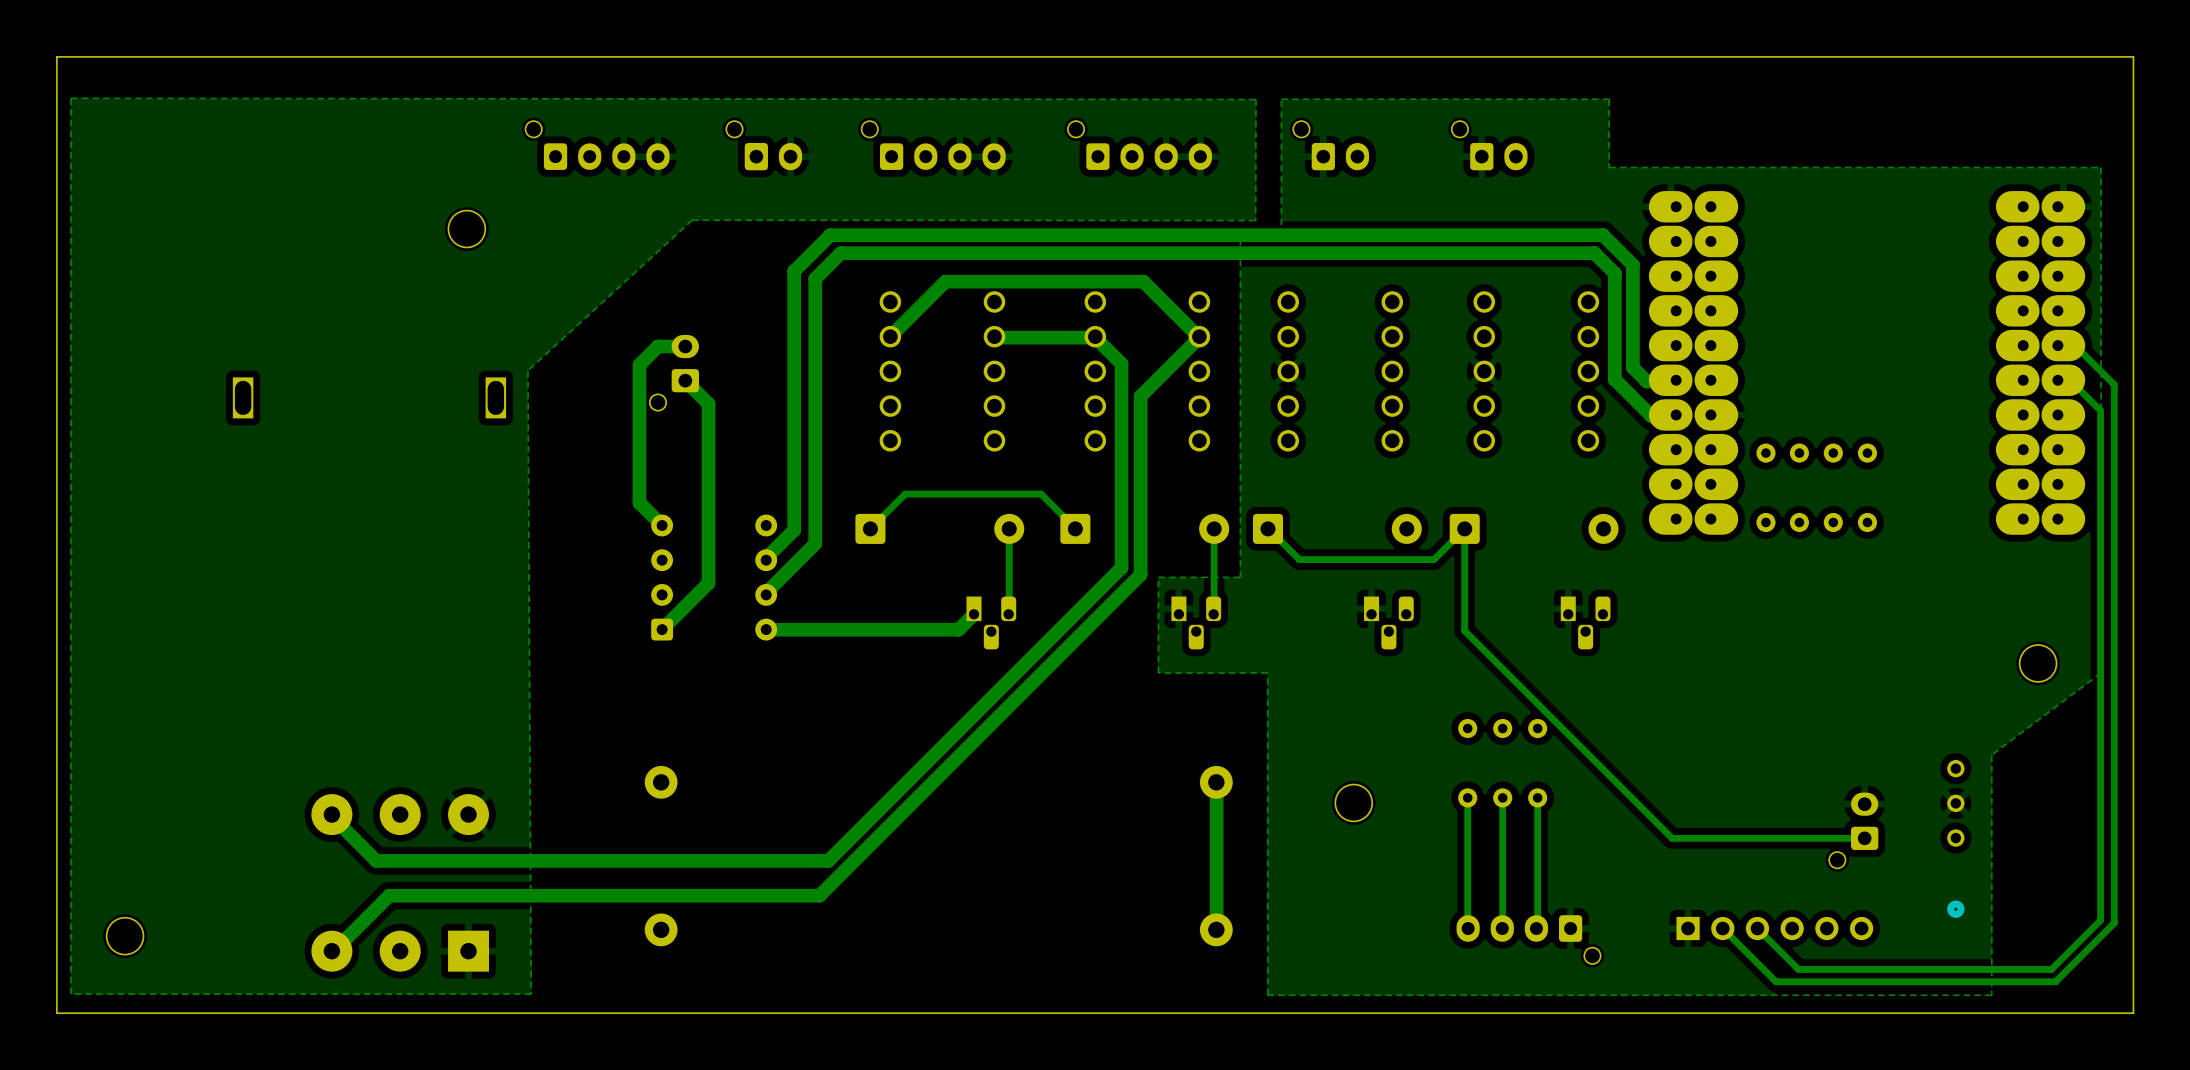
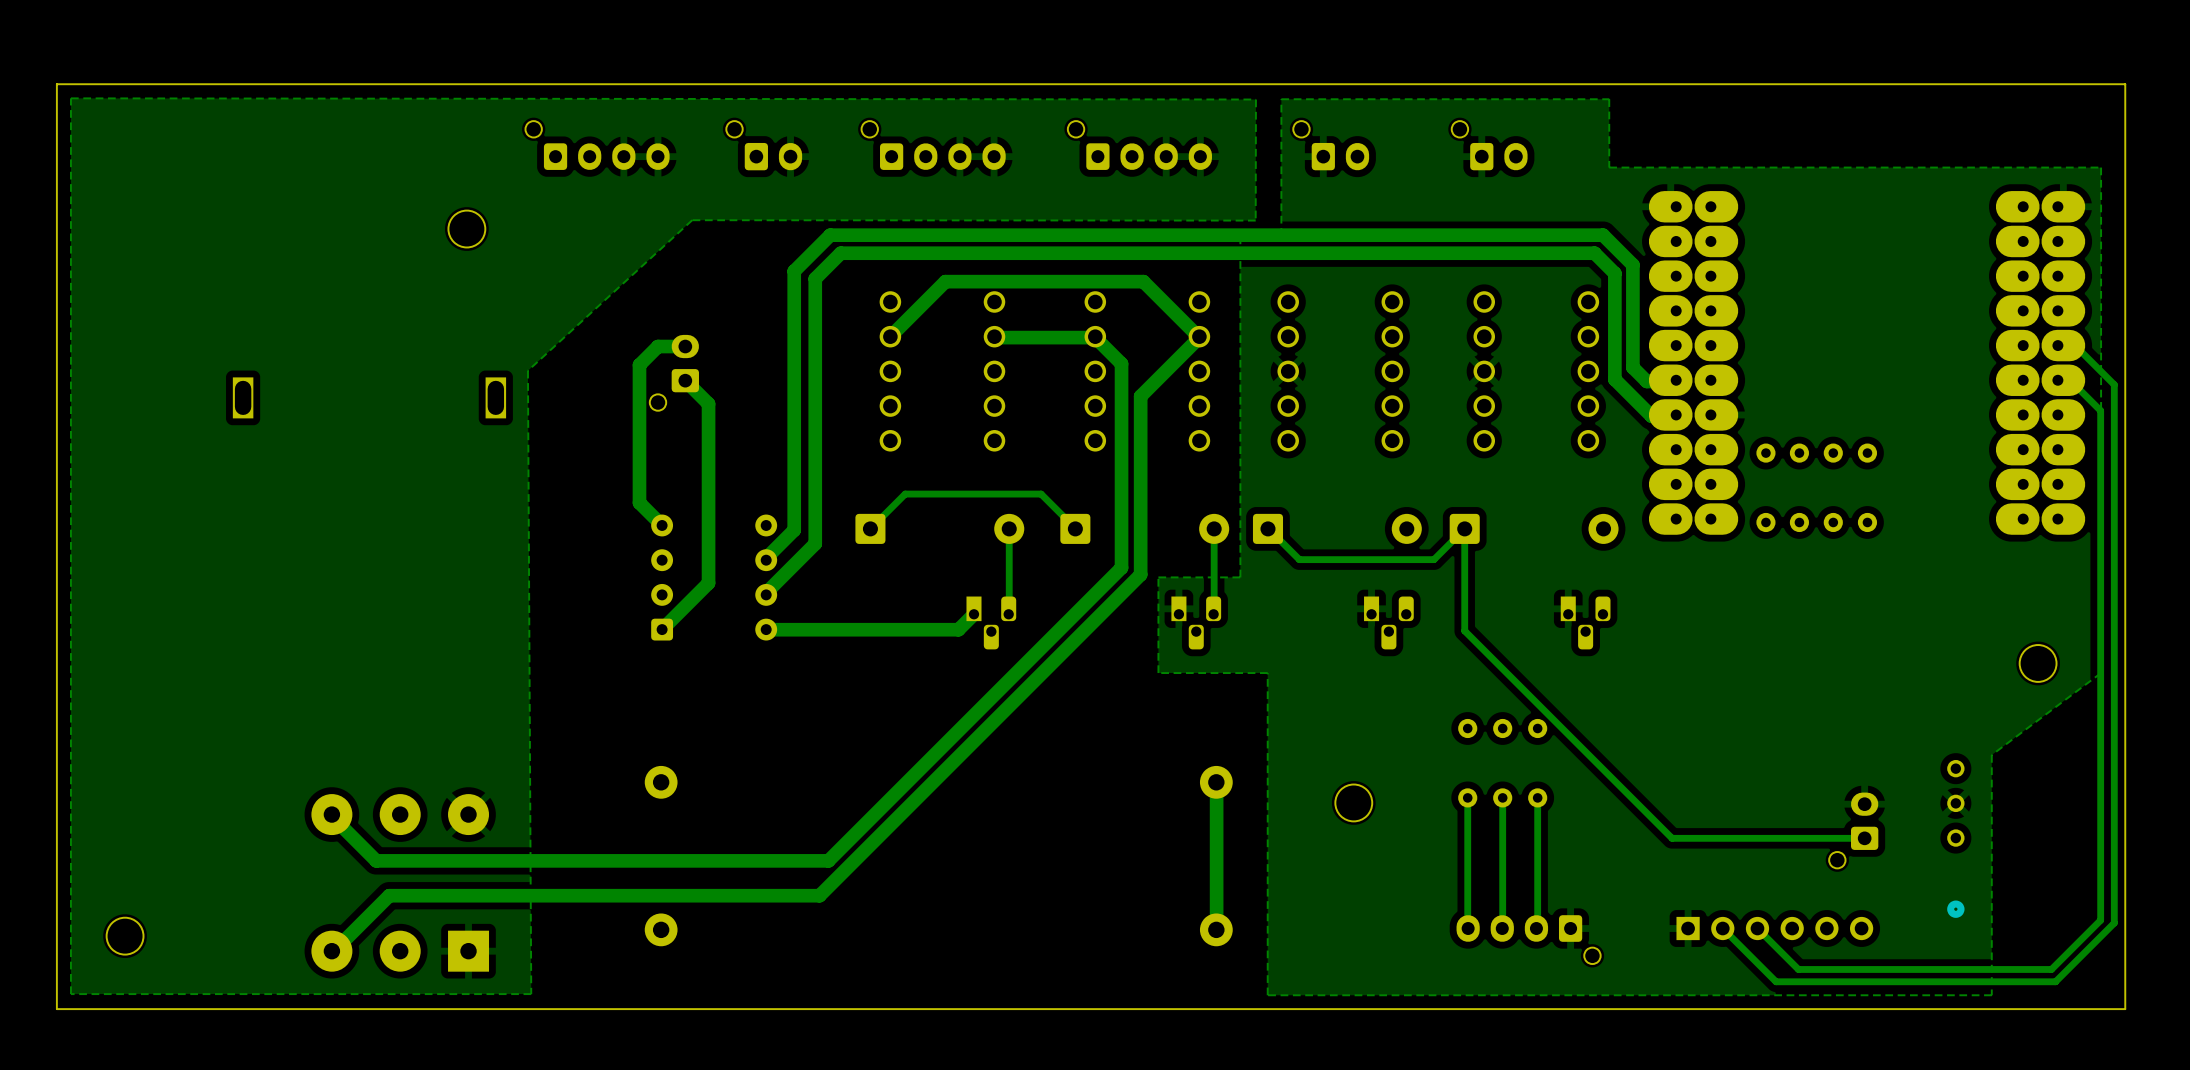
board edge: (56, 84) (56, 56) (2133, 56) (2133, 1013) (56, 1013) (56, 1009) -> (56, 84) (2125, 84) (2125, 1009) (56, 1009)

